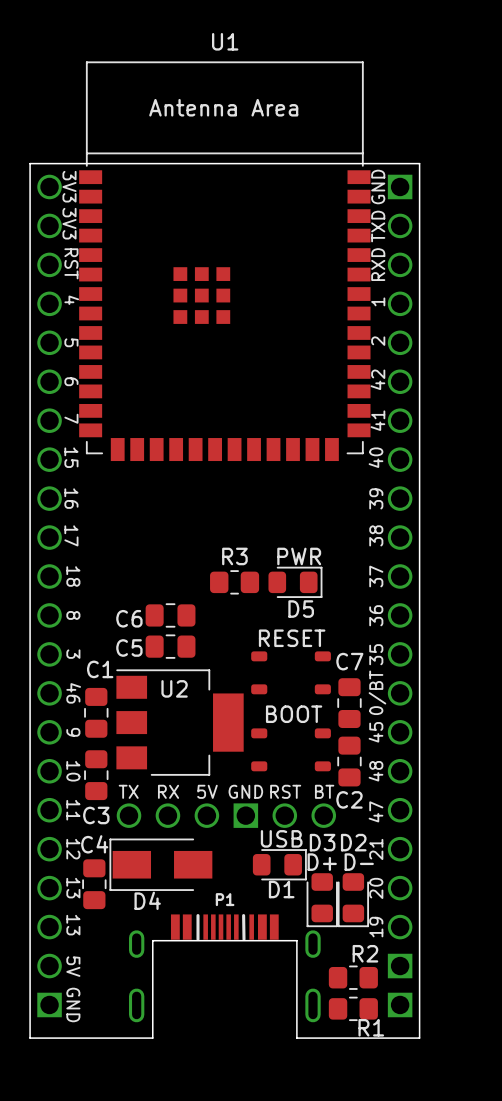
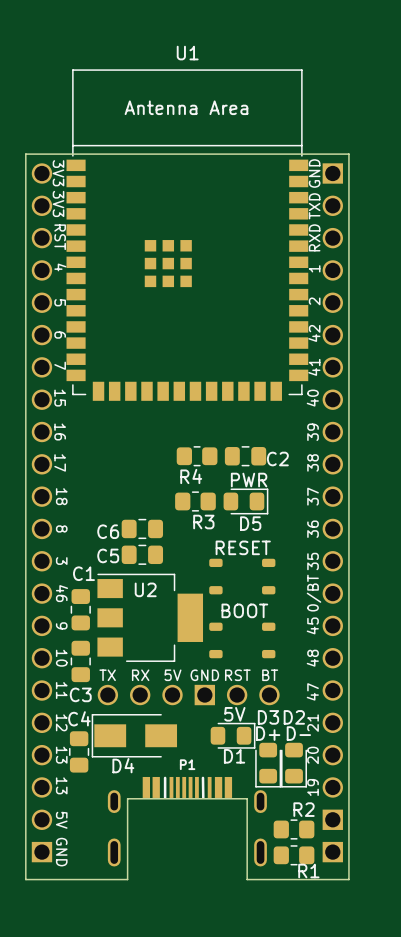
R4: none -> (197, 456)
R3 name position: R3 (234, 556) -> R3 (203, 522)
C7: (349, 703) -> none
C2 rotation: 0° (349, 761) -> 90° clockwise (245, 456)
C2 position: (349, 761) -> (245, 456)
C2 name position: C2 (349, 799) -> C2 (277, 459)
D1 value: USB (281, 838) -> 5V (234, 714)

